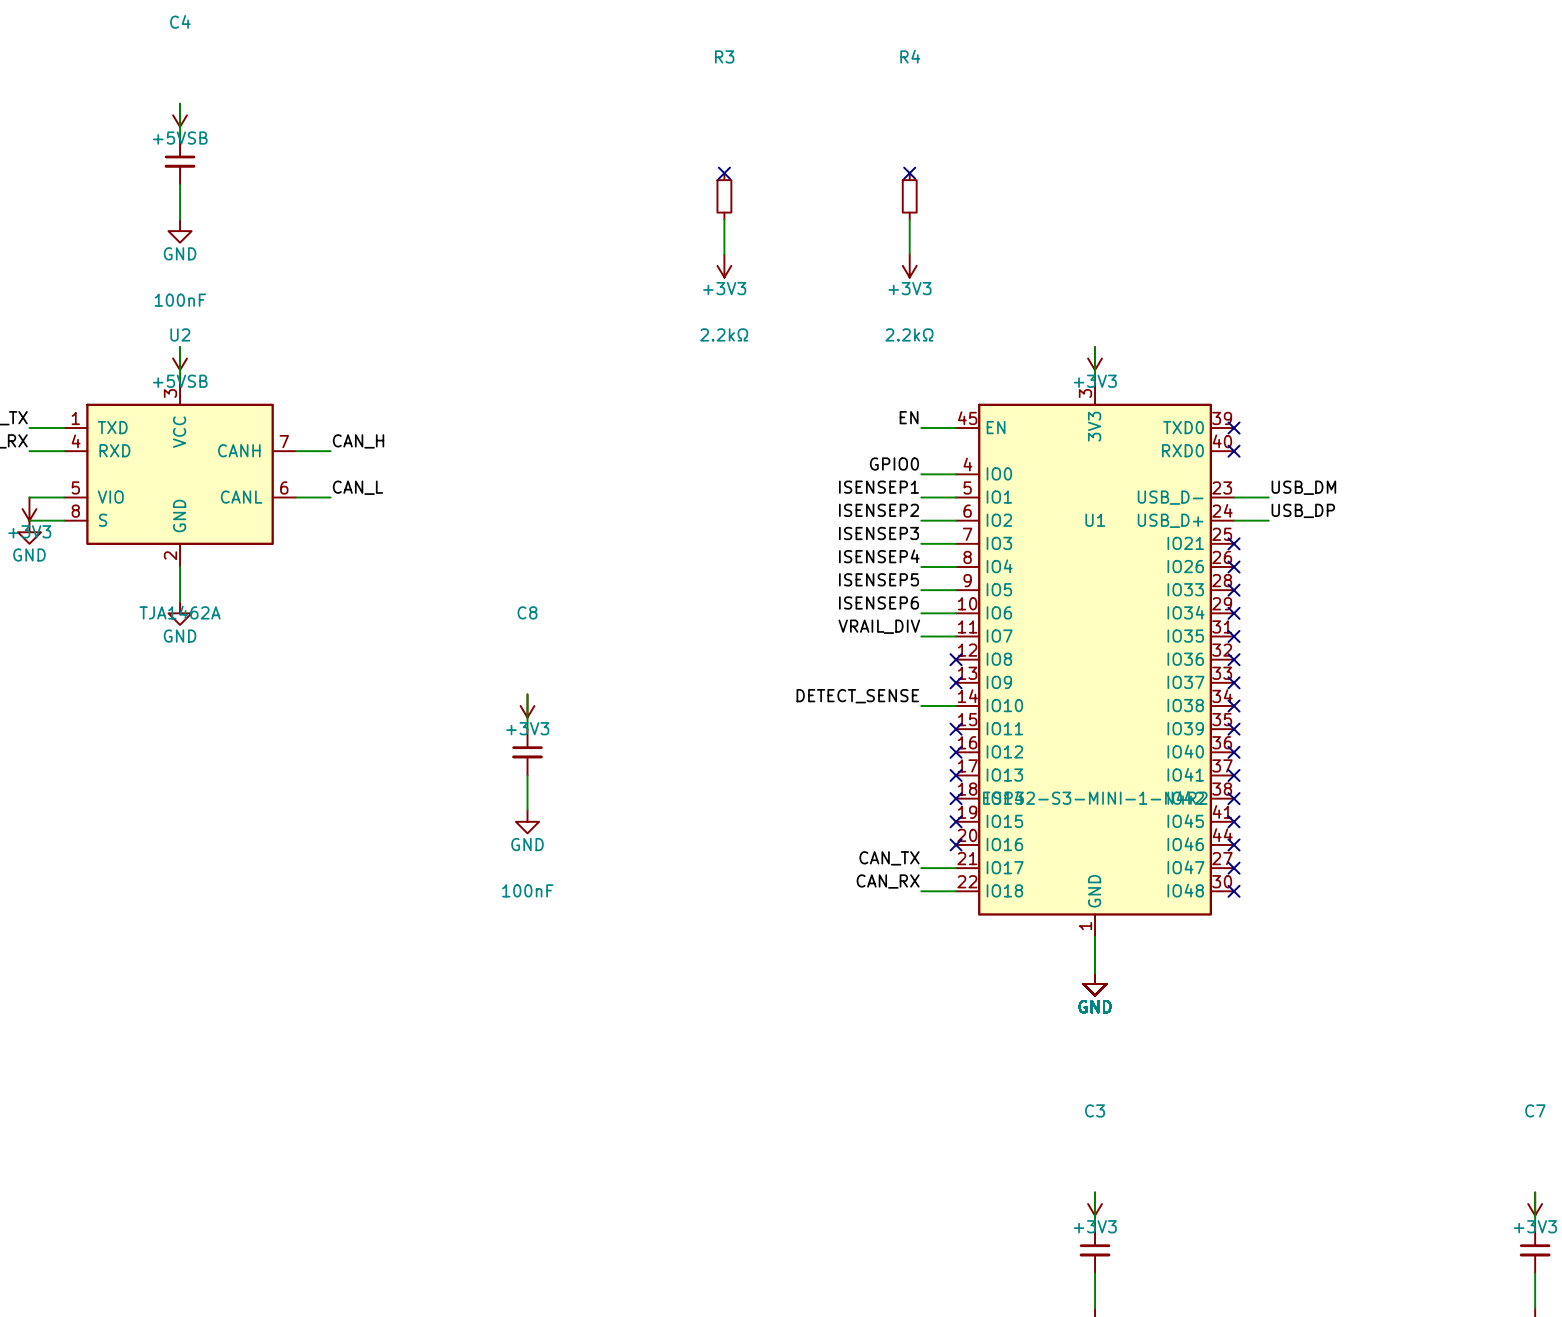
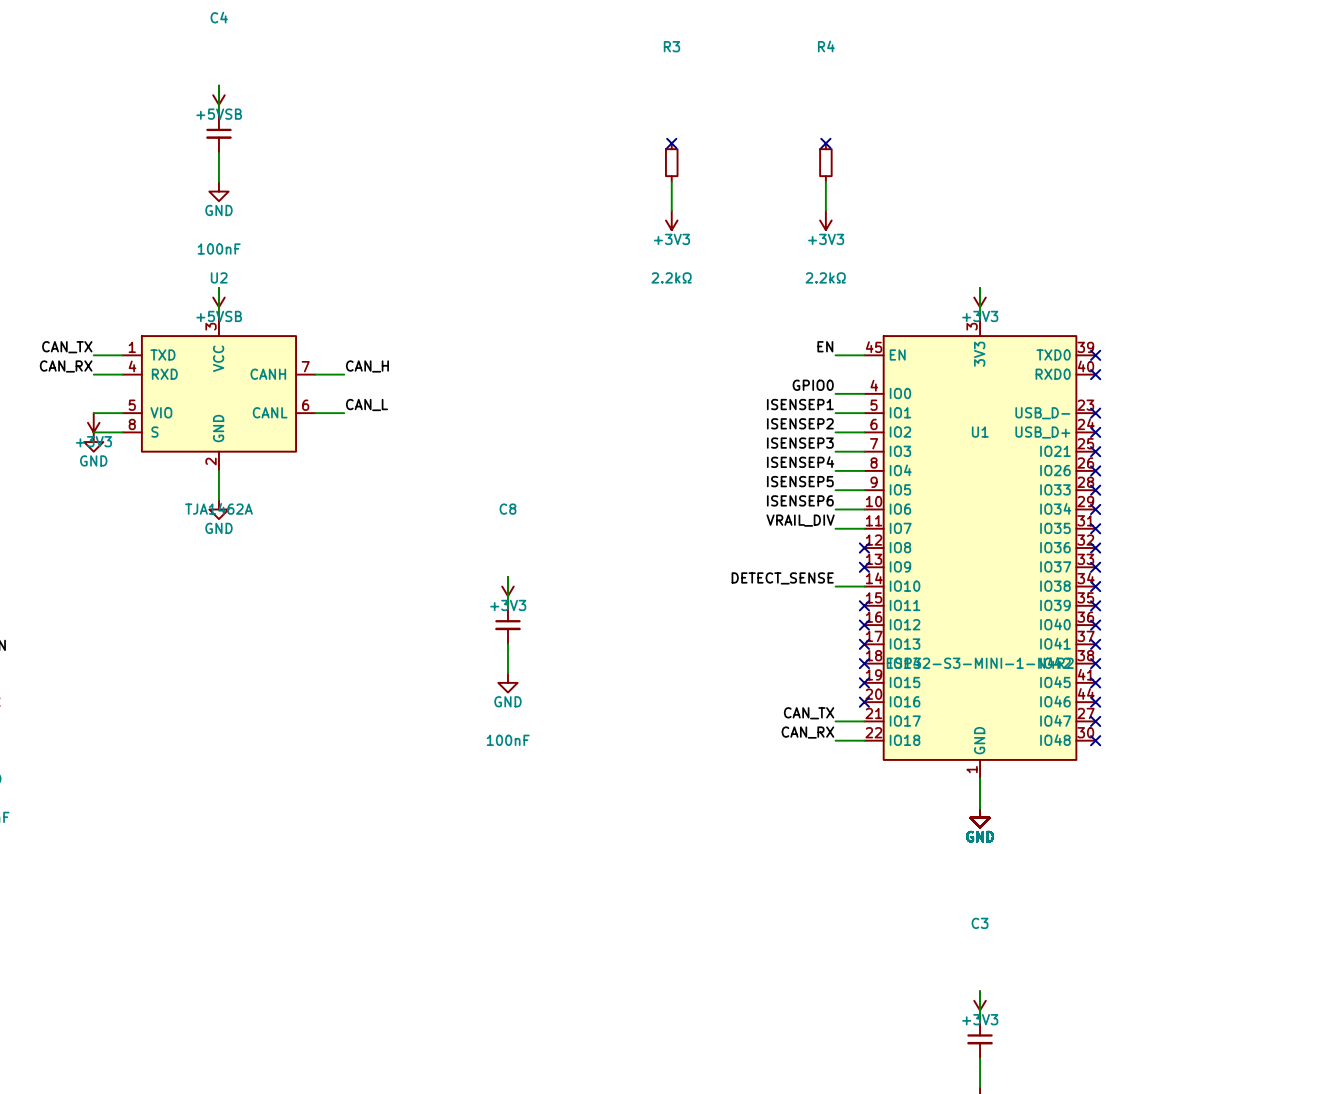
label: USB_DM (1303, 487) -> none
wire: (1234, 497) (1268, 497) -> none
no-connect mark: none -> (1095, 413)
label: USB_DP (1303, 510) -> none
wire: (1234, 520) (1268, 520) -> none
no-connect mark: none -> (1095, 432)

